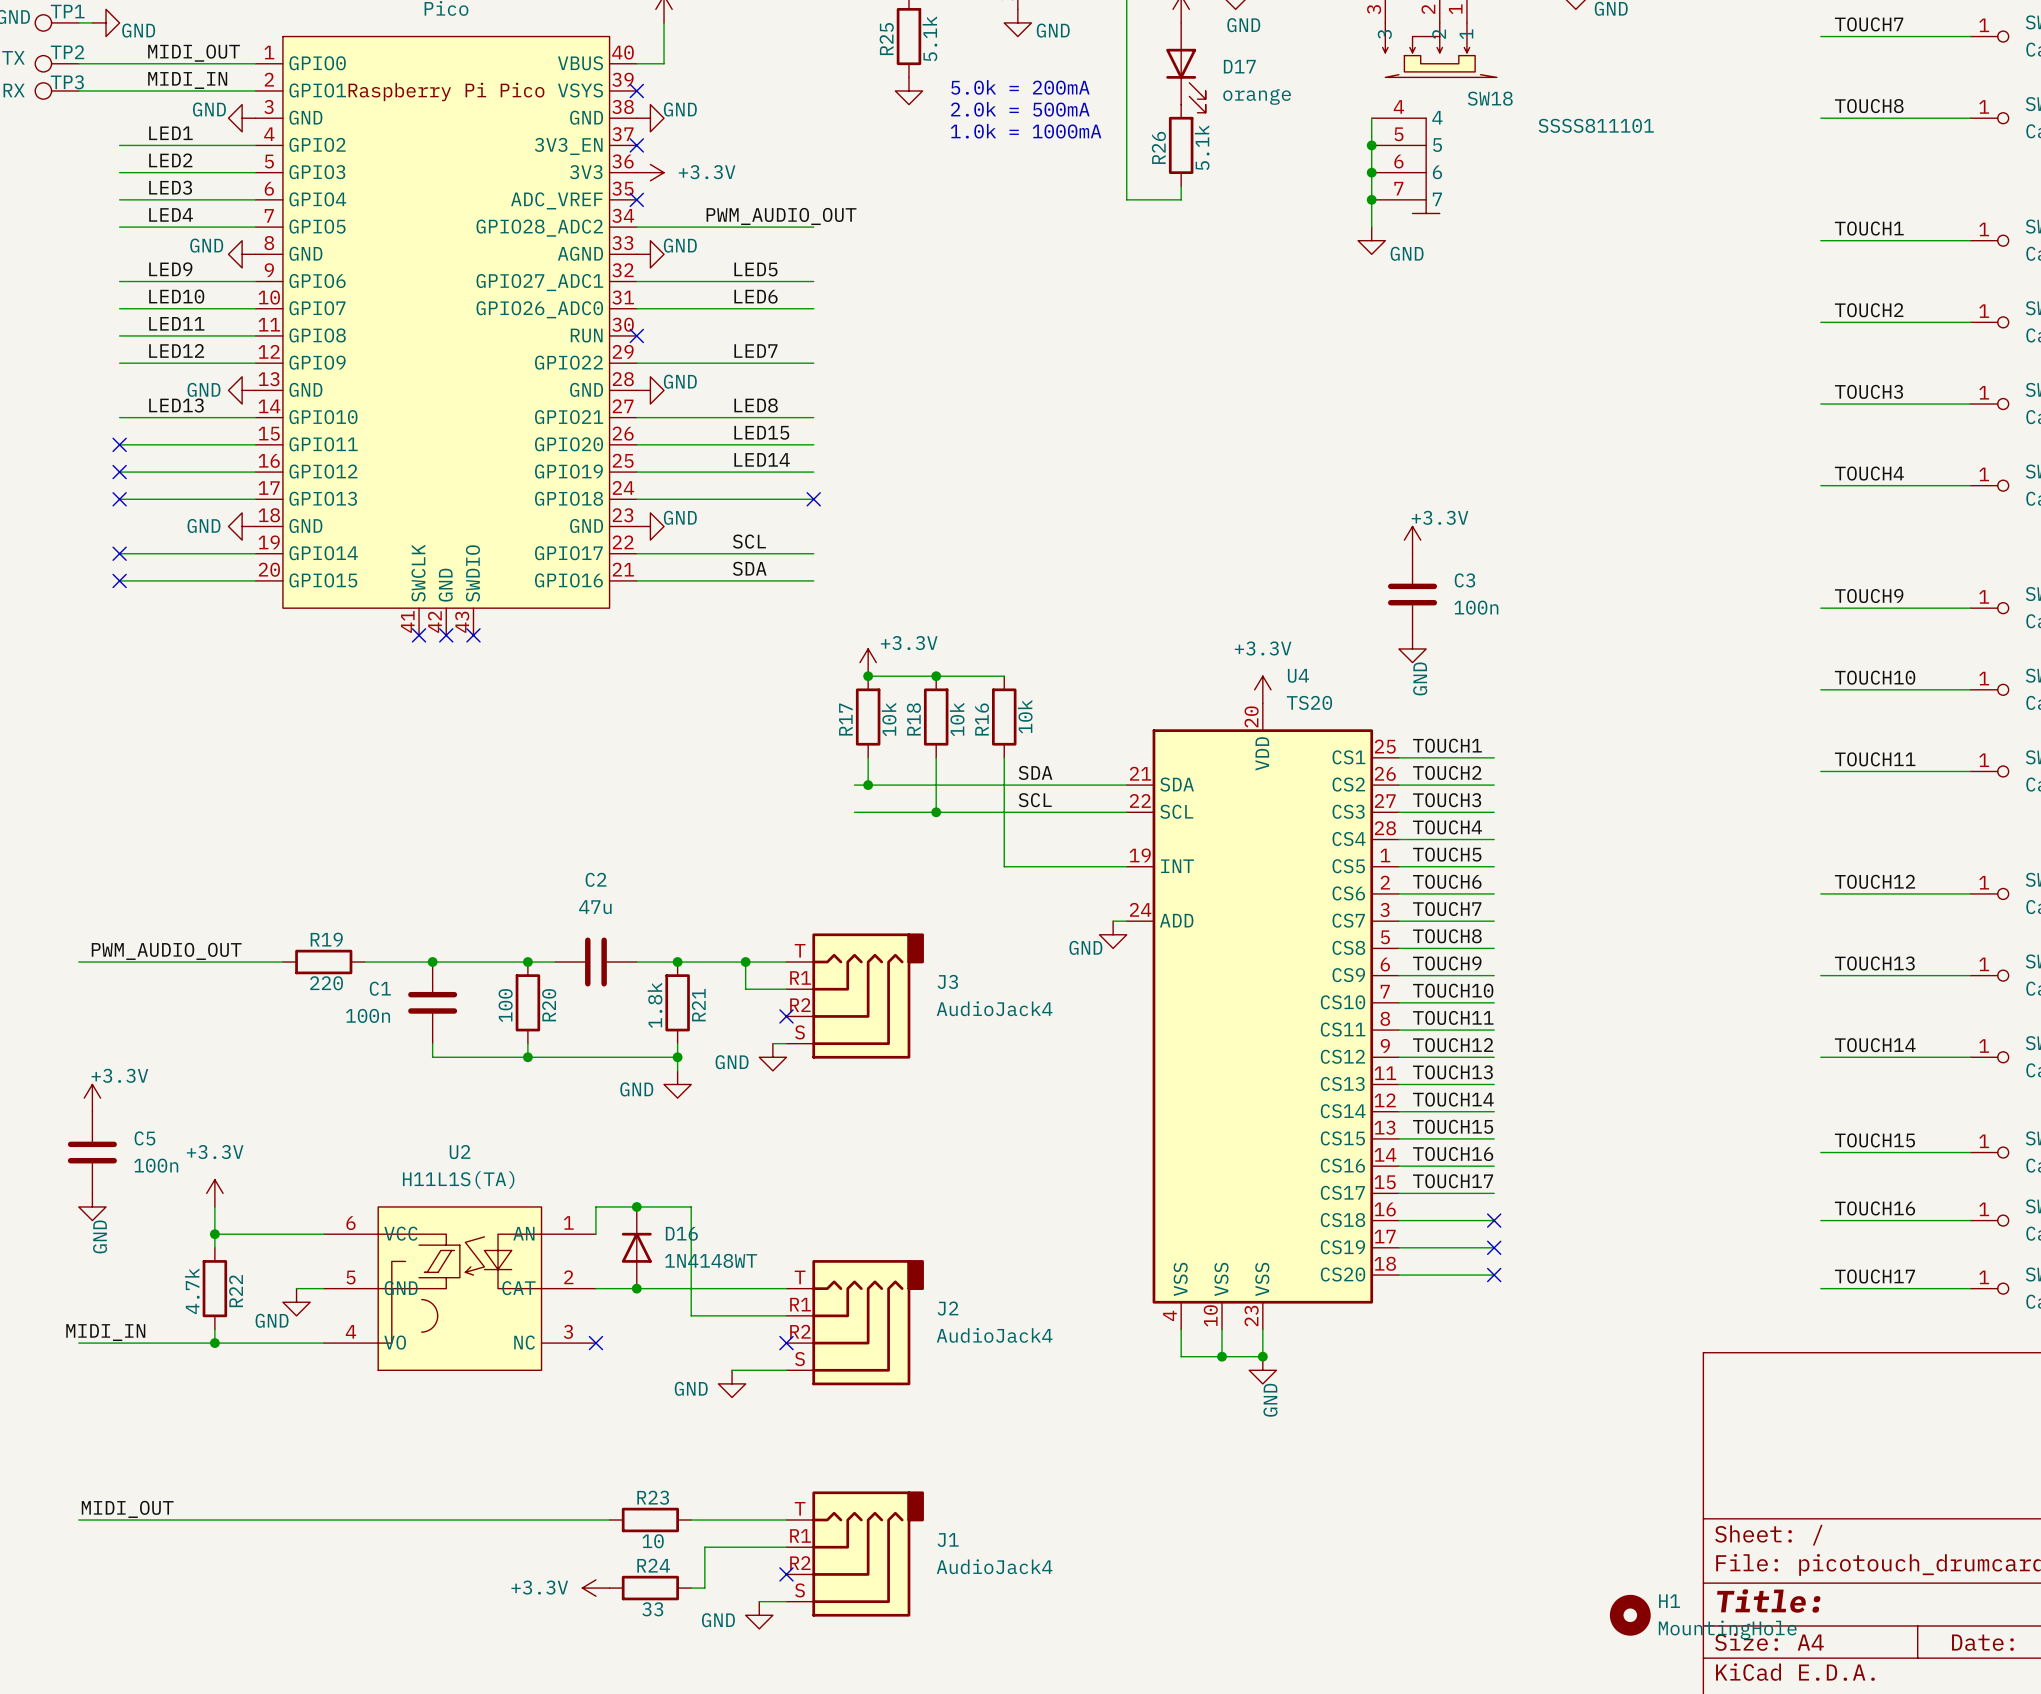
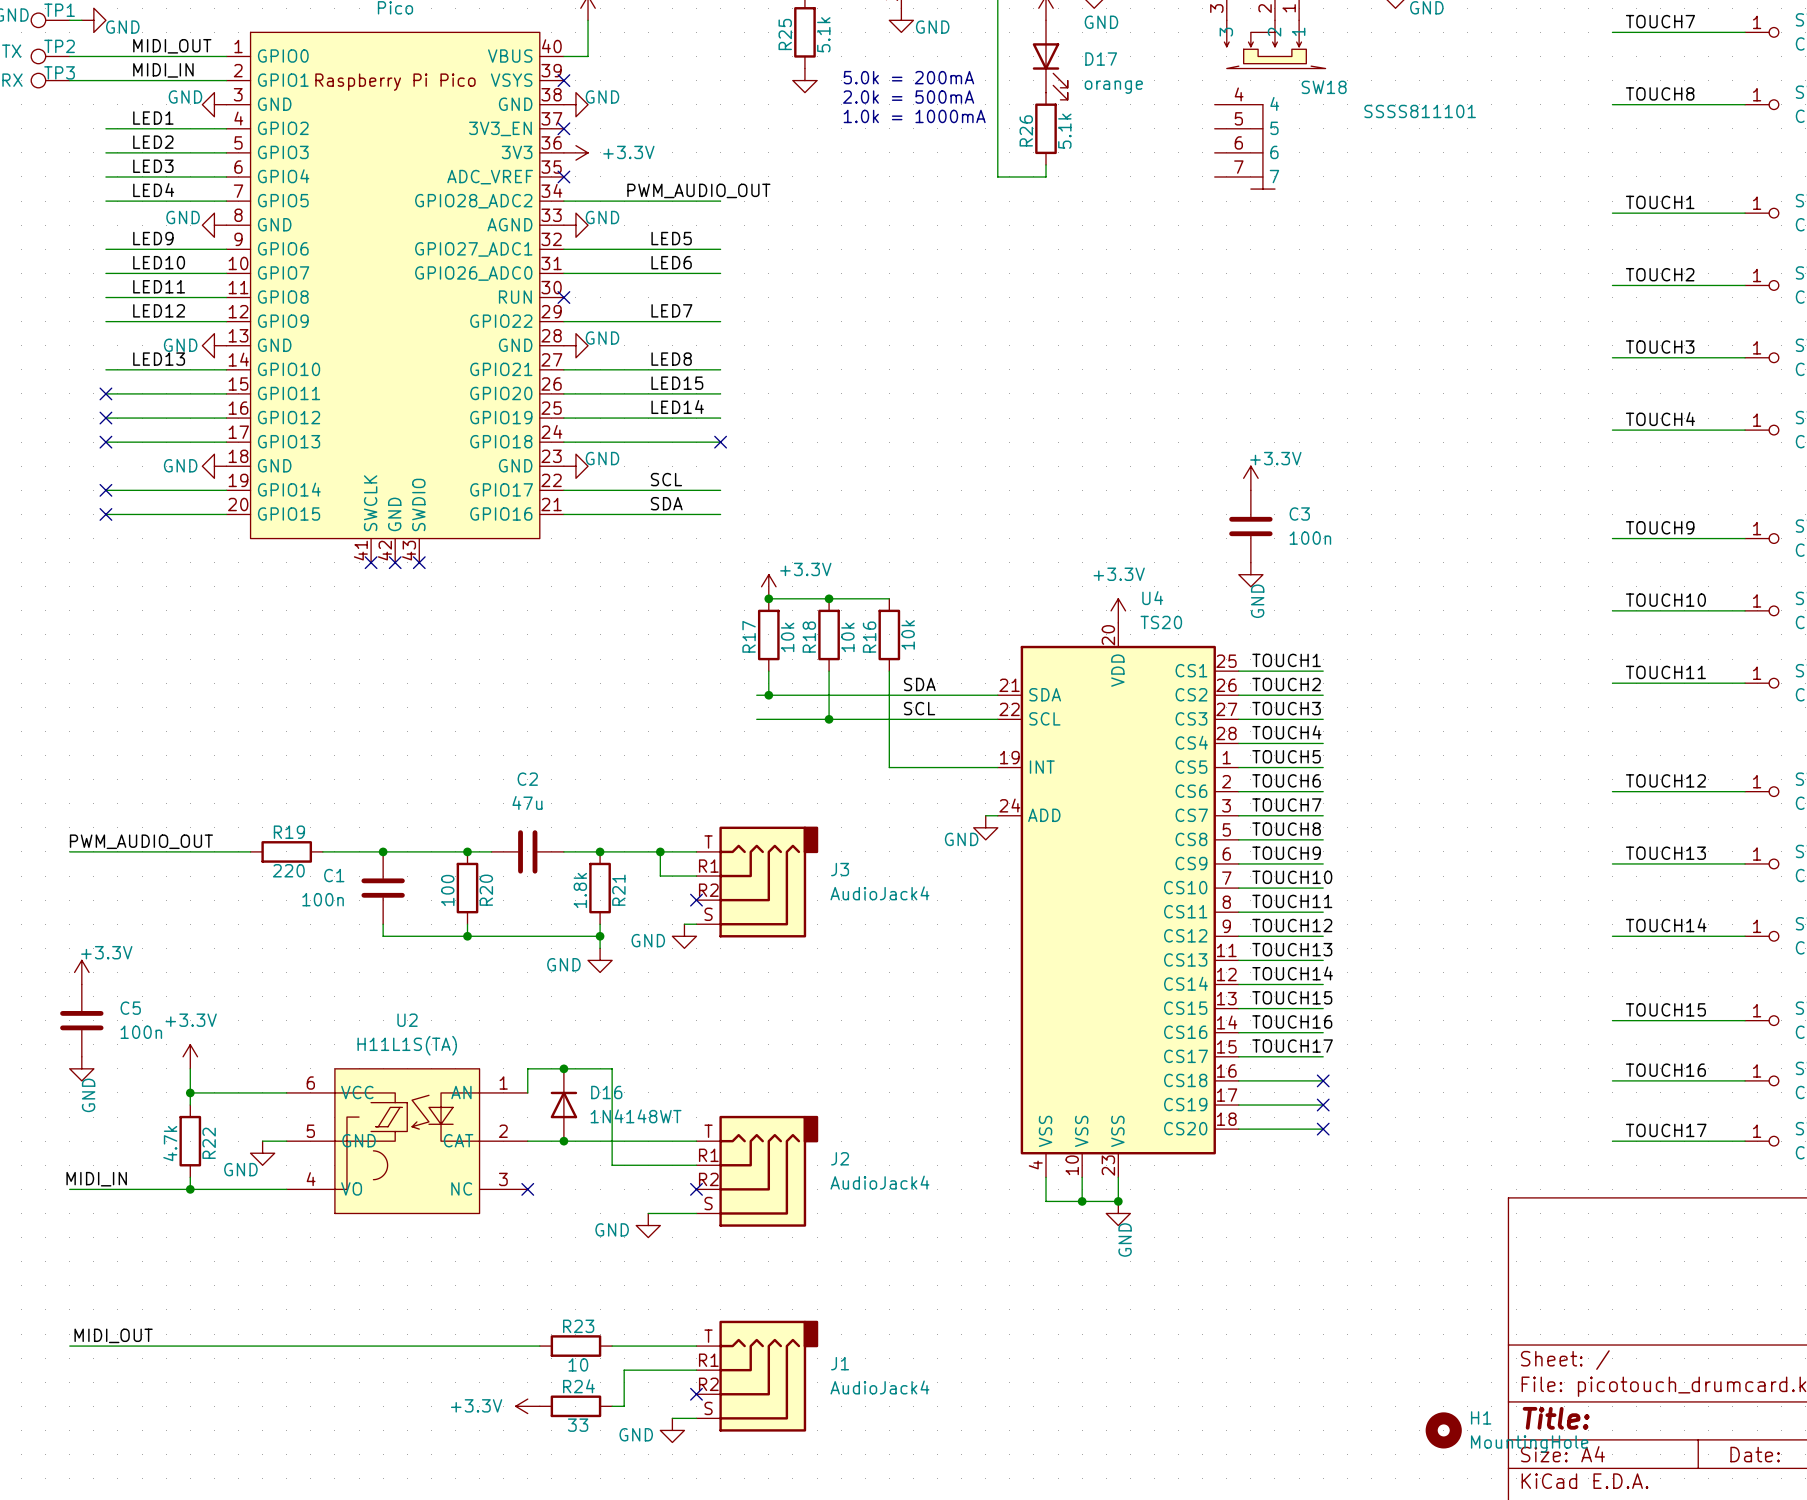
wire: (1371, 118) (1371, 227) -> none
junction: (1371, 145) -> none
junction: (1371, 172) -> none
junction: (1371, 199) -> none
power symbol: GND (1371, 240) -> none

